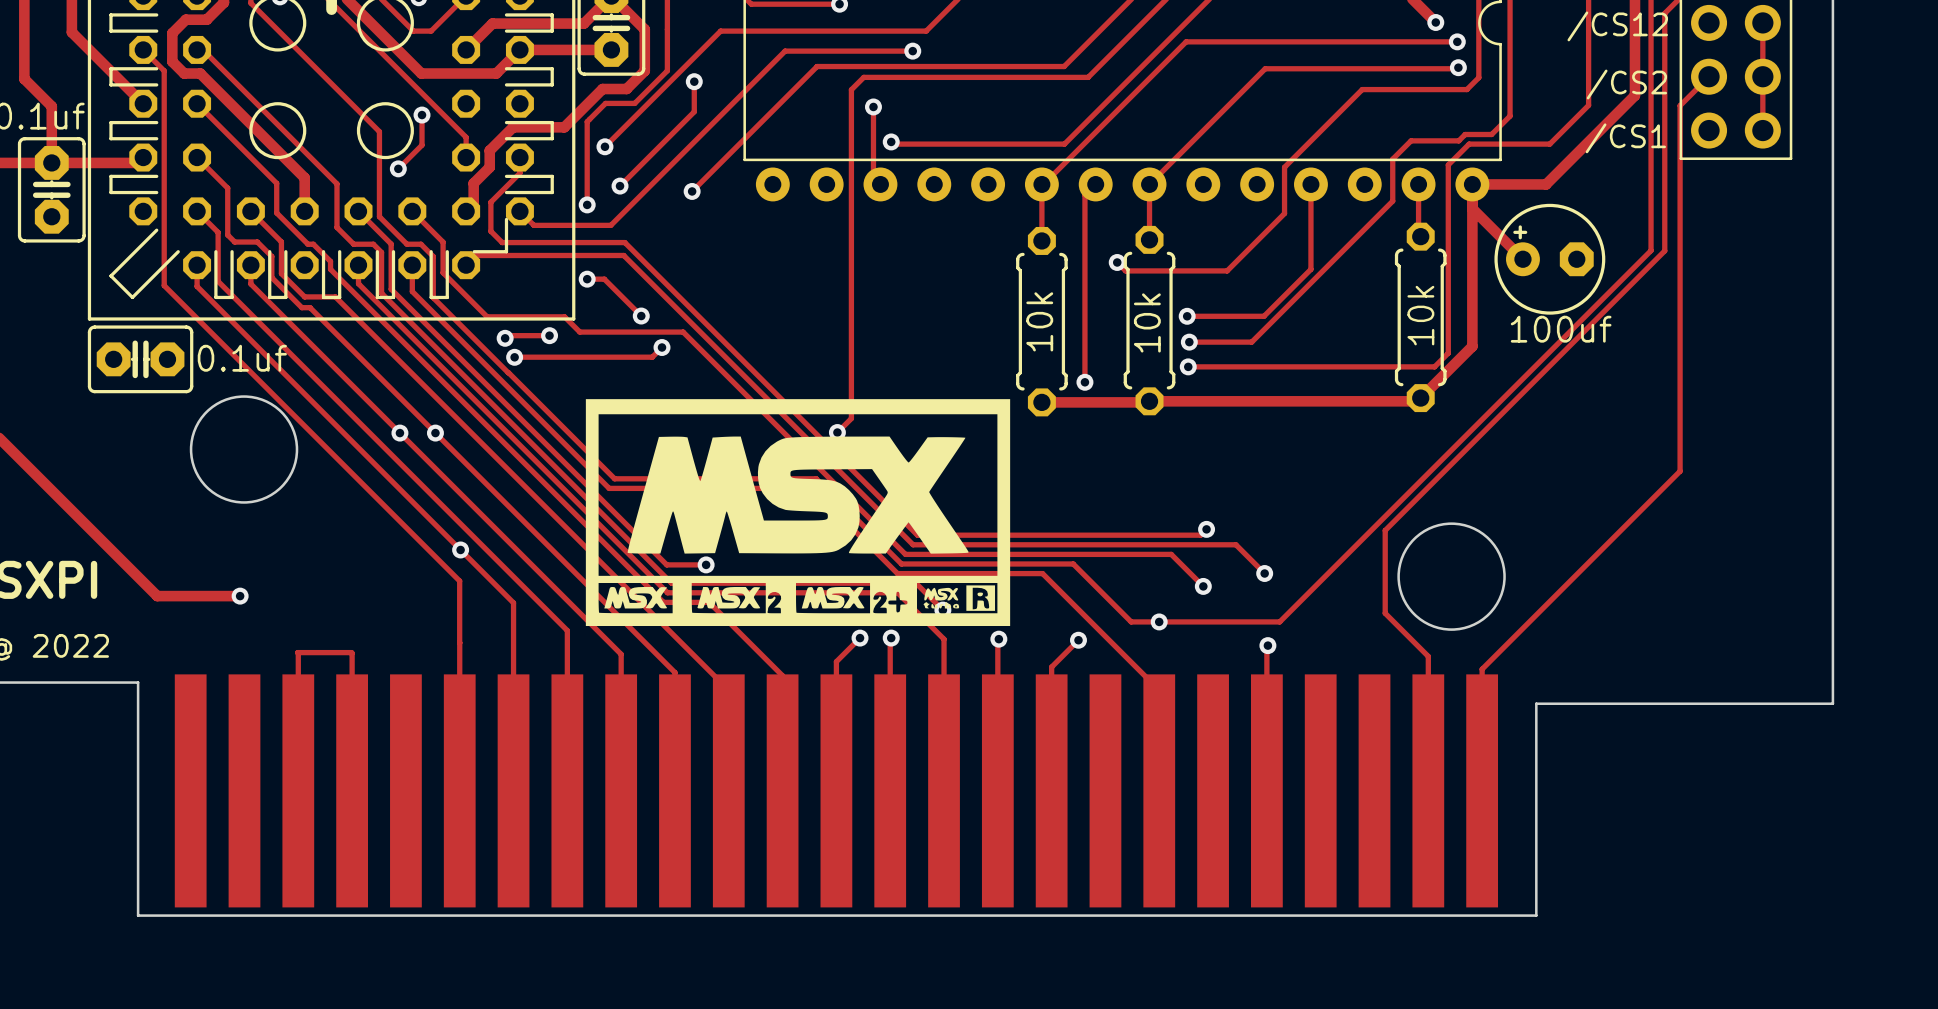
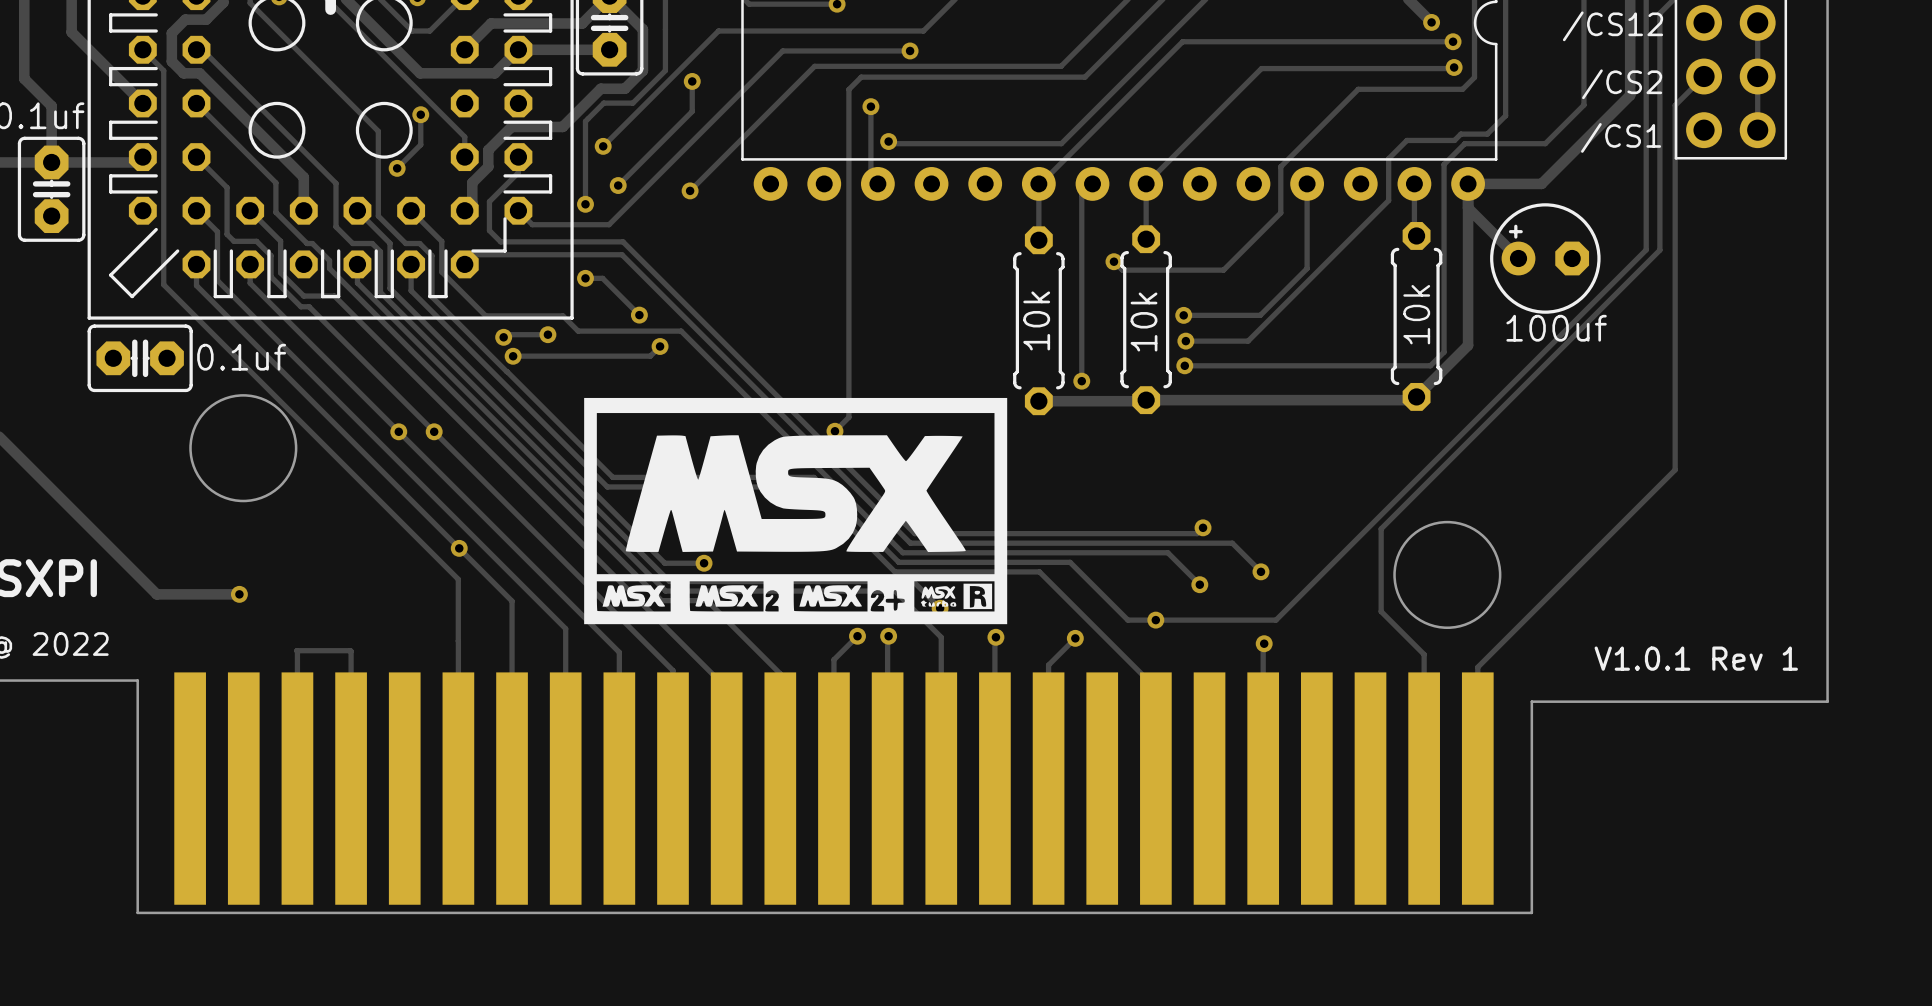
text: none -> V1.0.1 Rev 1 (1696, 658)

